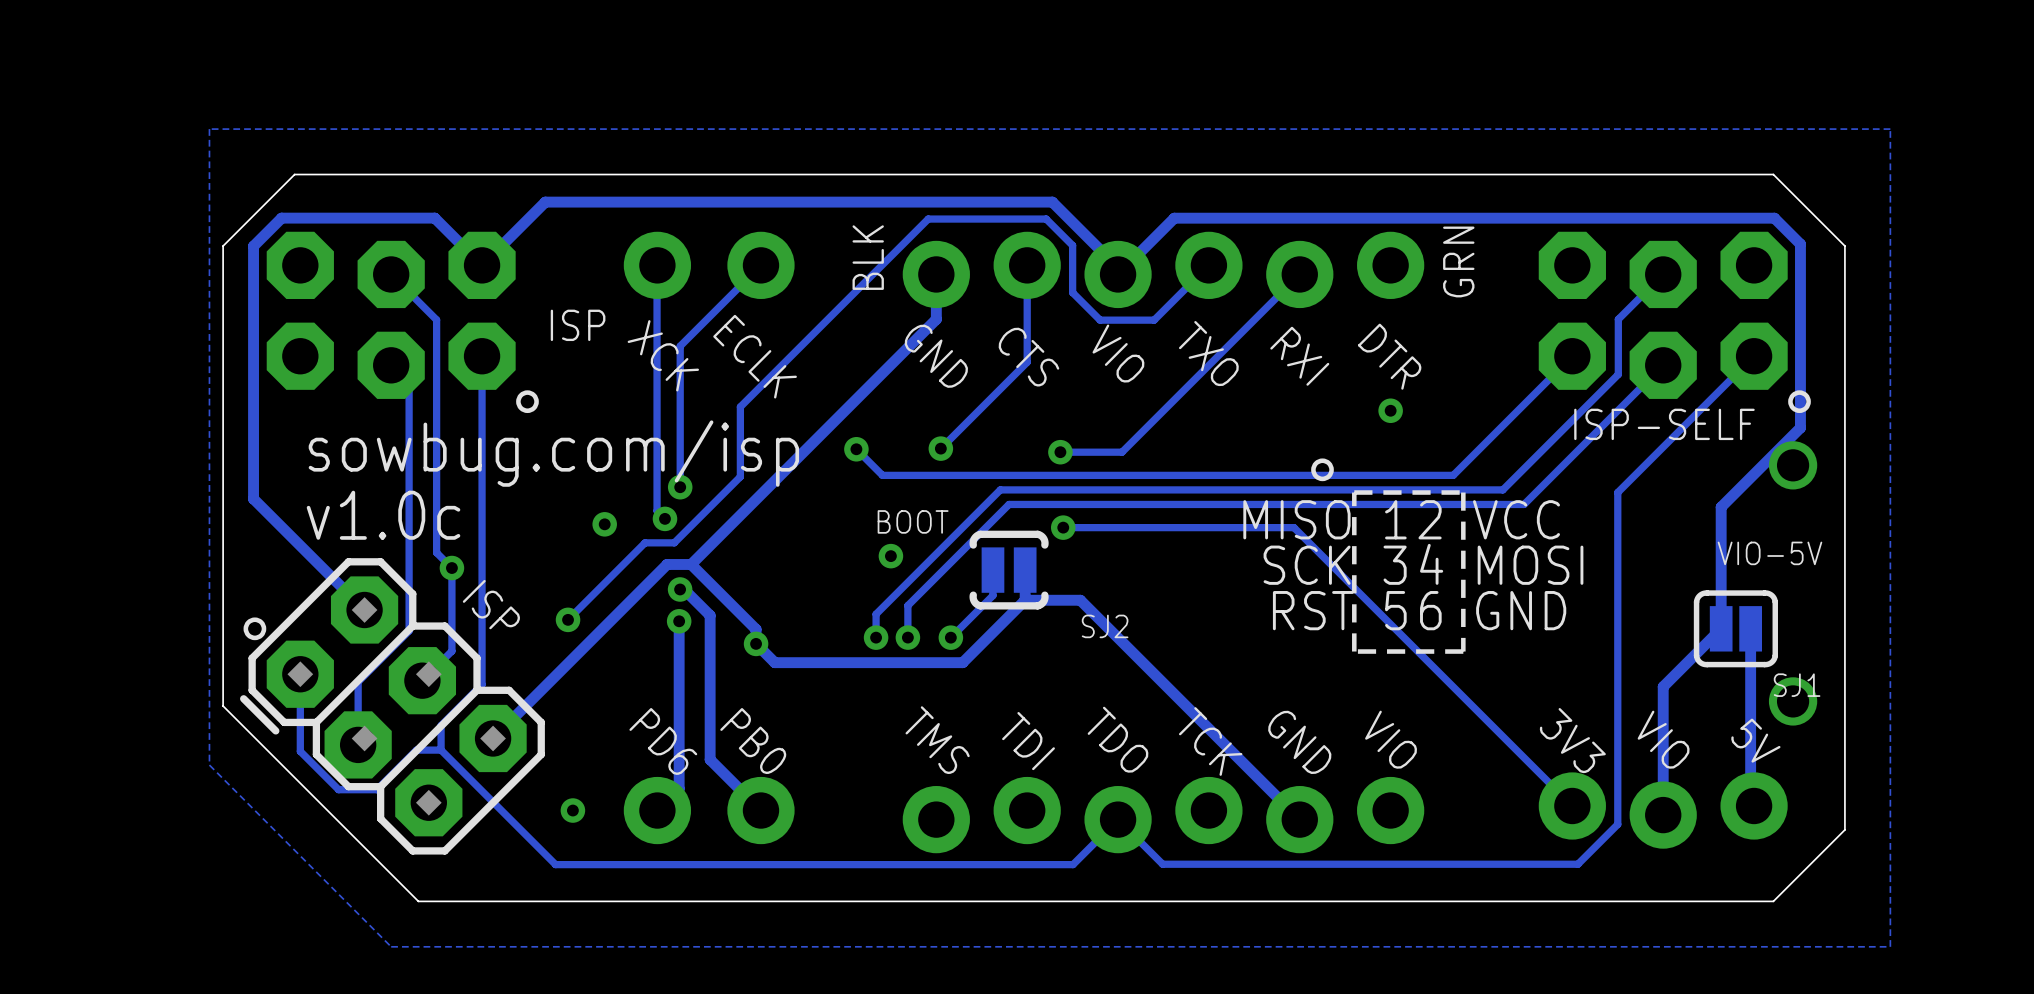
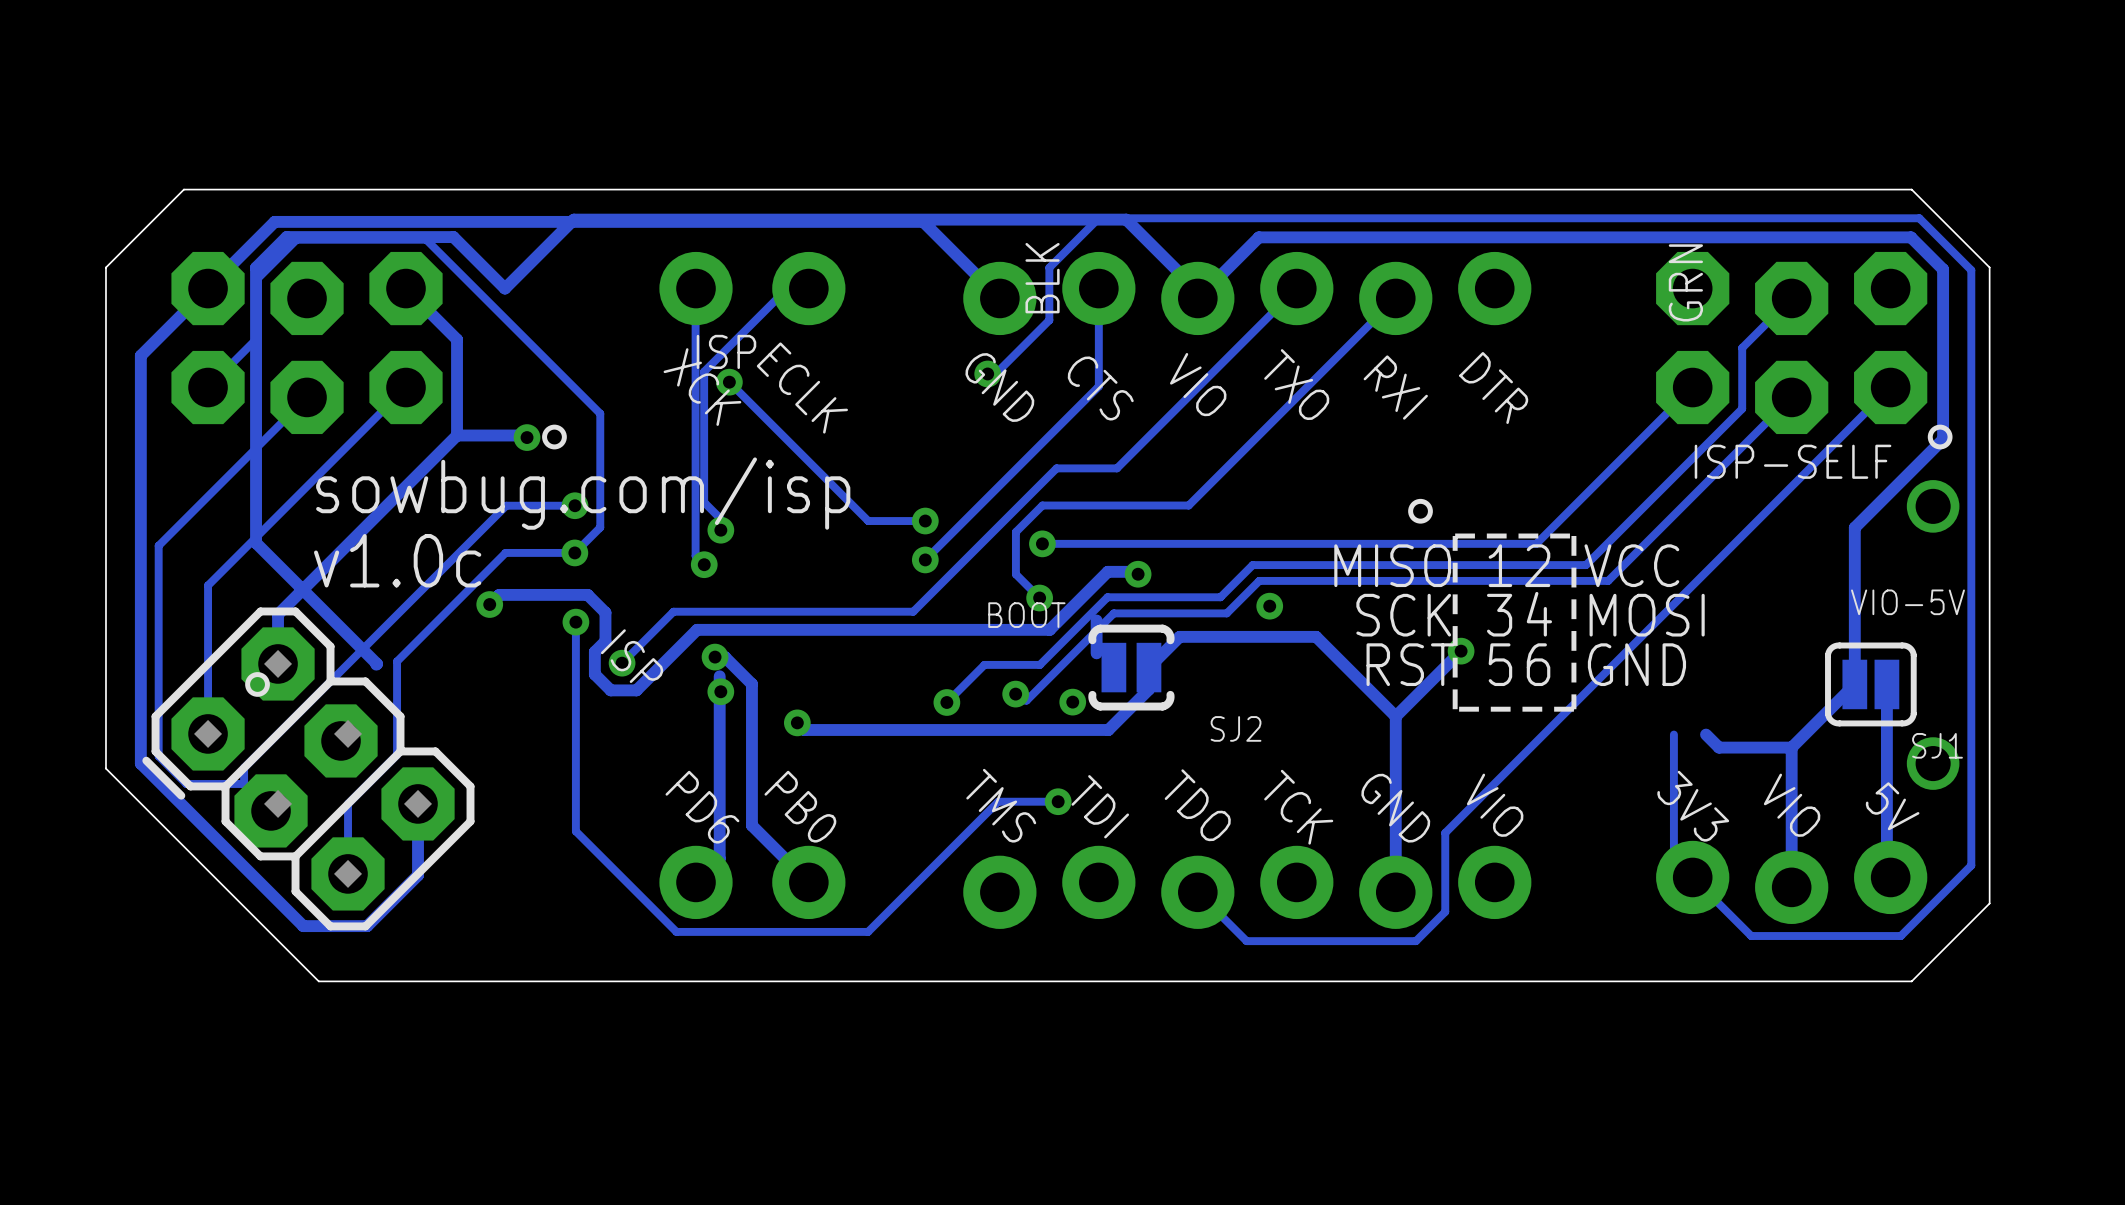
zone outline: (1890, 129) (209, 129) (209, 765) (391, 946) (1890, 946) (1890, 129) -> none
board edge: (294, 174) (223, 246) (223, 706) (418, 901) -> (300, 189) (183, 189) (105, 267) (105, 768) (318, 981) (435, 981)
track: (1174, 218) (1774, 218) (1800, 244) (1800, 427) (1721, 507) -> (1258, 237) (1911, 237) (1943, 269) (1943, 439) (1854, 527) (1854, 551)
text position: BLK (868, 257) -> BLK (1042, 278)
text position: GRN (1458, 261) -> GRN (1685, 282)
track: none -> (406, 288) (457, 339) (457, 435)
track: (760, 265) (680, 346) (680, 487) -> (808, 288) (787, 288) (704, 371) (704, 502) (720, 518)
track: (391, 274) (436, 319) (436, 552) (451, 568) (451, 651) (422, 680) (428, 674) -> none
track: (936, 274) (936, 319) (691, 564) -> (999, 298) (923, 221) (274, 221) (140, 355) (140, 763) (303, 926) (367, 926) (418, 875) (418, 803)
part position: (391, 315) -> (307, 342)
track: (1618, 319) (1618, 374) (1502, 489) (1000, 489) (876, 614) (876, 637) -> (1742, 347) (1742, 408) (1585, 565) (1252, 565) (1220, 597) (1107, 597) (1039, 664) (984, 664) (946, 702)
track: (1154, 320) (1100, 320) (1072, 292) (1072, 245) (1046, 219) (928, 219) (740, 406) (740, 476) (674, 542) (645, 542) (568, 619) -> (1237, 348) (1116, 468) (1056, 468) (913, 611) (673, 611) (622, 663)
text position: ISP (578, 325) -> ISP (726, 351)
track: none -> (987, 373) (995, 373) (1049, 320) (1049, 267) (1098, 218) (1919, 218) (1971, 270) (1971, 865) (1900, 936) (1751, 936) (1692, 877)
via: none -> (987, 373)
track: none -> (729, 382) (868, 521) (925, 521)
via: none -> (729, 382)
track: (1027, 355) (1027, 362) (940, 448) -> (1098, 386) (925, 559)
track: none -> (208, 387) (257, 338) (257, 278) (296, 239) (426, 239) (600, 413) (600, 527) (574, 552) (505, 552) (397, 661) (397, 754) (348, 803) (348, 873)
track: none -> (406, 387) (208, 585) (208, 733)
track: (482, 356) (482, 684) (441, 725) (441, 750) -> none
track: none -> (307, 397) (158, 545) (158, 756) (186, 783) (244, 783)
track: (391, 365) (409, 383) (409, 630) (358, 681) (358, 744) (354, 737) (358, 737) -> none
track: none -> (457, 435) (278, 614) (278, 663)
track: none -> (457, 435) (524, 435) (527, 437)
via: none -> (527, 437)
via: (1390, 410) -> none
via: (940, 448) -> none
track: (856, 449) (882, 475) (1453, 475) -> (1042, 543) (1536, 543) (1562, 517)
via position: (856, 449) -> (925, 521)
via: (1060, 452) -> none
track: (1122, 452) (1060, 452) -> (1202, 492) (1188, 505) (1042, 505) (1015, 532) (1015, 574) (1039, 598)
track: none -> (574, 505) (506, 505) (244, 767) (244, 783)
via: none -> (574, 505)
track: (1617, 492) (1617, 824) (1577, 864) (1162, 864) -> (1742, 535) (1445, 832) (1445, 911) (1415, 941) (1246, 941)
via: none -> (1042, 543)
track: (1524, 504) (1009, 504) (907, 605) (907, 637) -> (1640, 548) (1608, 580) (1259, 580) (1226, 613) (1113, 613) (1026, 700) (1009, 700)
via: none -> (574, 552)
via: none -> (925, 559)
via: (604, 524) -> none
track: none -> (1141, 571) (1107, 571) (1049, 629) (697, 629) (636, 690) (610, 690) (594, 674) (594, 651) (605, 641) (605, 612) (587, 594) (499, 594) (489, 604)
track: (1063, 527) (1294, 527) (1555, 788) -> (1673, 734) (1673, 858)
via: none -> (1039, 598)
via: (890, 556) -> none
via: none -> (1269, 606)
track: (691, 564) (756, 629) (756, 643) (774, 662) (962, 662) (1025, 600) (1080, 600) (1299, 819) -> (1395, 716) (1395, 892)
track: (691, 564) (667, 564) (493, 738) -> none
via position: (451, 568) -> (489, 604)
track: (992, 570) (992, 595) (950, 637) -> none
SJ2 position: (1009, 570) -> (1131, 667)
track: none -> (575, 622) (575, 831) (676, 931) (868, 931) (998, 801) (1058, 801)
via: none -> (575, 622)
track: (680, 589) (684, 589) (710, 615) (710, 759) -> (715, 657) (724, 657) (751, 684) (753, 827)
via: (680, 589) -> none
track: none -> (1461, 651) (1395, 716)
via: none -> (1461, 651)
via: none -> (715, 657)
text position: ISP (491, 604) -> ISP (632, 656)
via position: (568, 619) -> (622, 663)
via: (679, 621) -> none
via: none -> (720, 691)
via: (876, 637) -> none
via: (907, 637) -> none
via position: (756, 643) -> (797, 722)
via: none -> (946, 702)
via: none -> (1072, 702)
track: none -> (1395, 716) (1316, 636) (1179, 636) (1148, 667) (1148, 689) (1108, 729) (804, 729) (797, 722)
track: (300, 674) (300, 751) (338, 789) (376, 789) (416, 750) (441, 750) -> none
track: none -> (1706, 734) (1719, 747) (1791, 747)
part position: (392, 706) -> (308, 768)
via: none -> (1058, 801)
track: (441, 750) (555, 864) (1073, 864) (1118, 819) -> none
via: (572, 810) -> none

